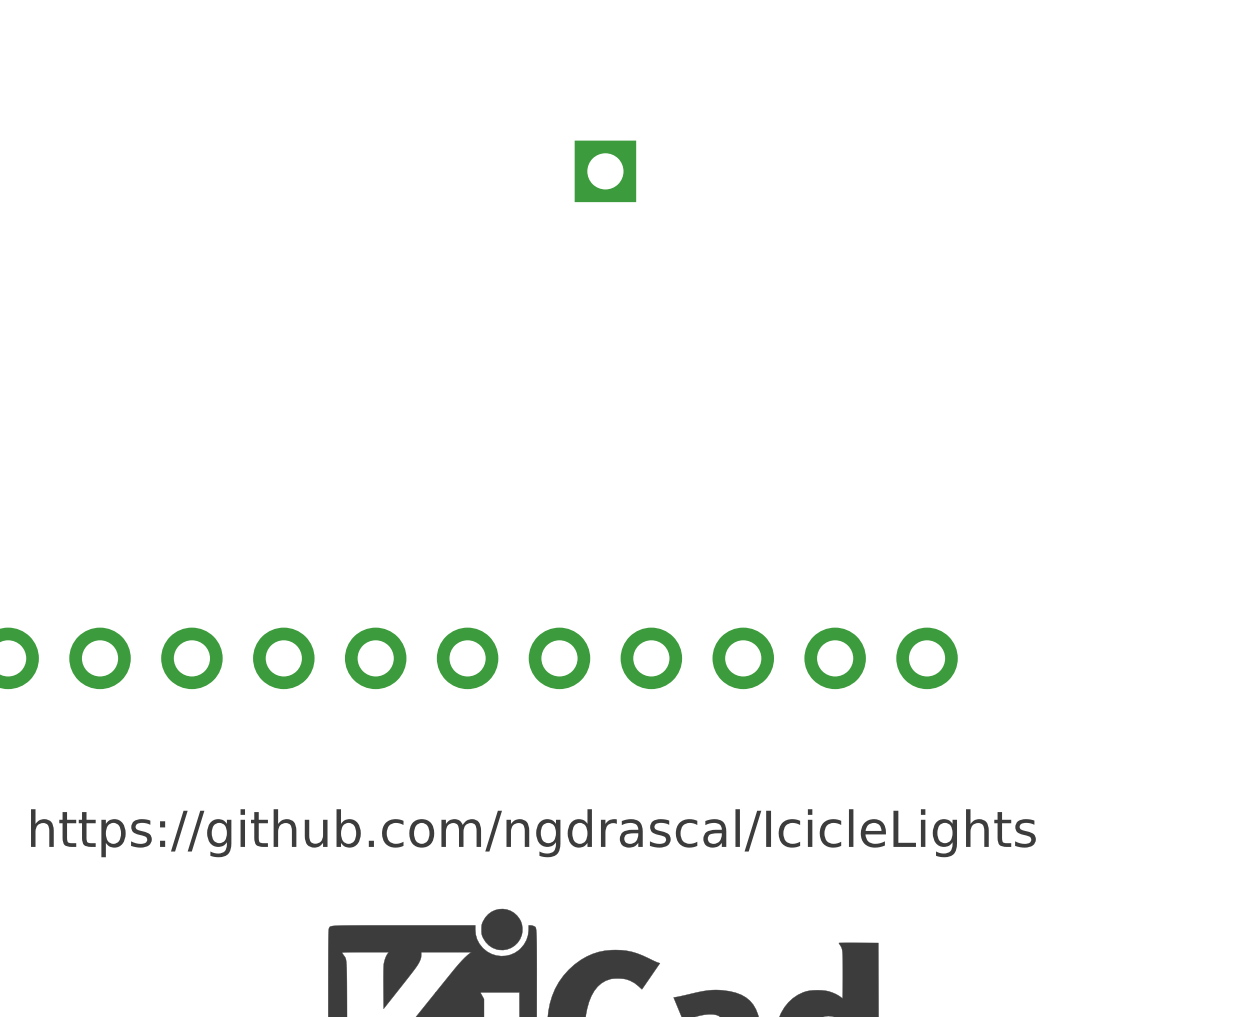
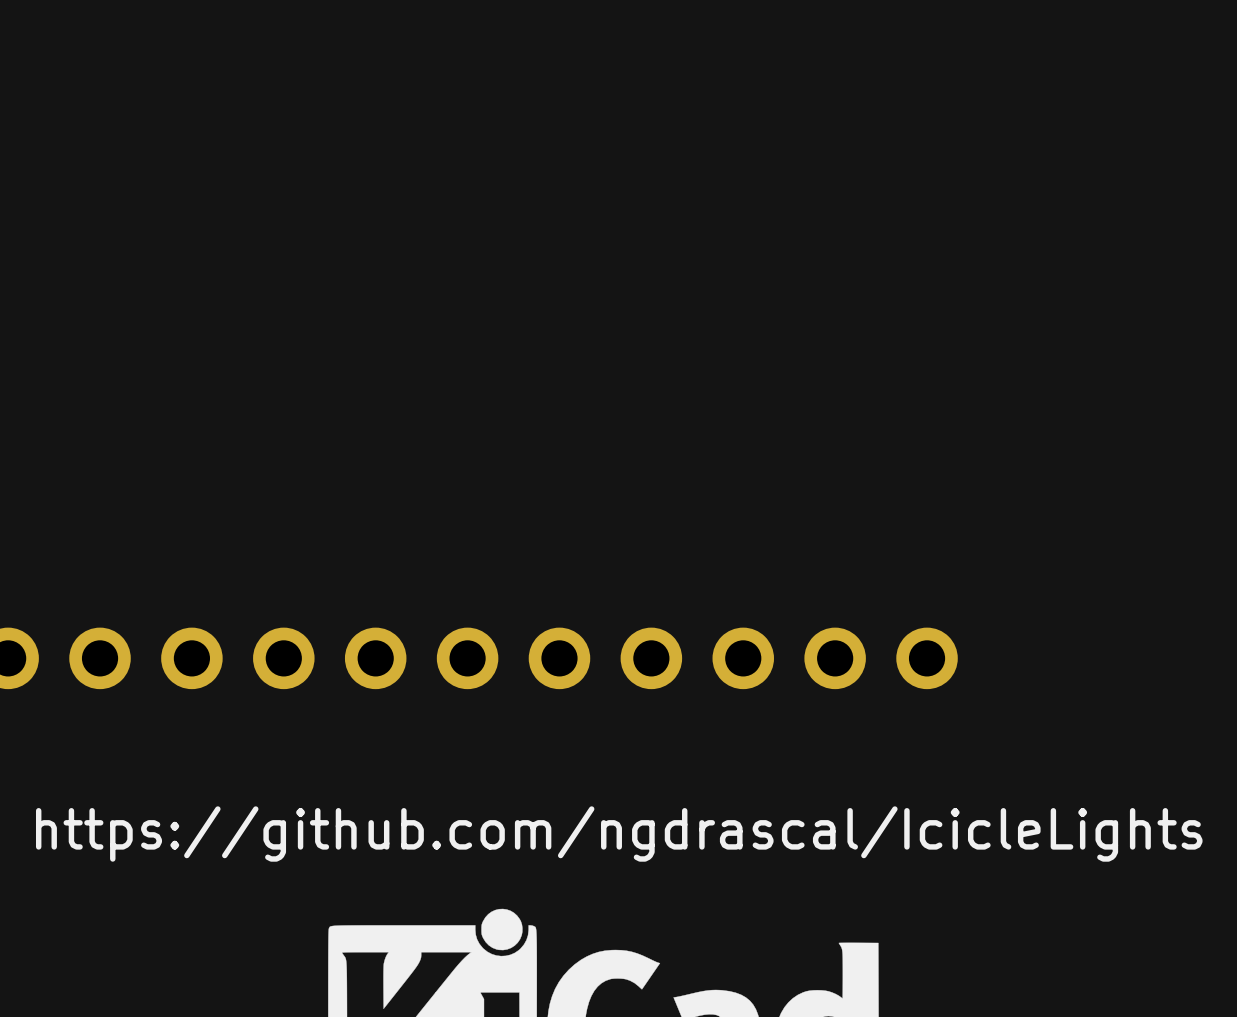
part: (605, 171) -> none

